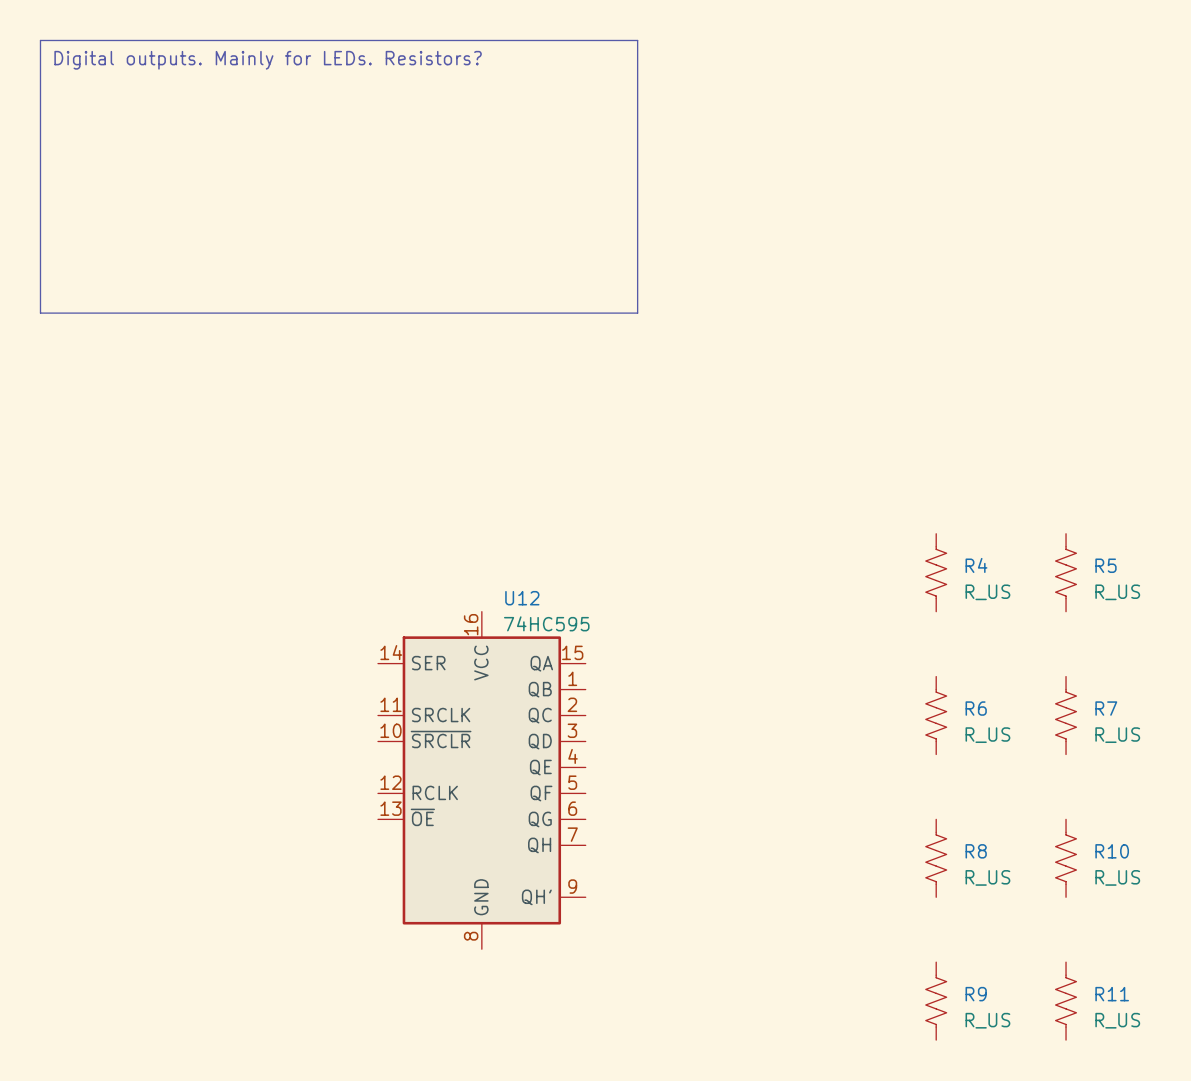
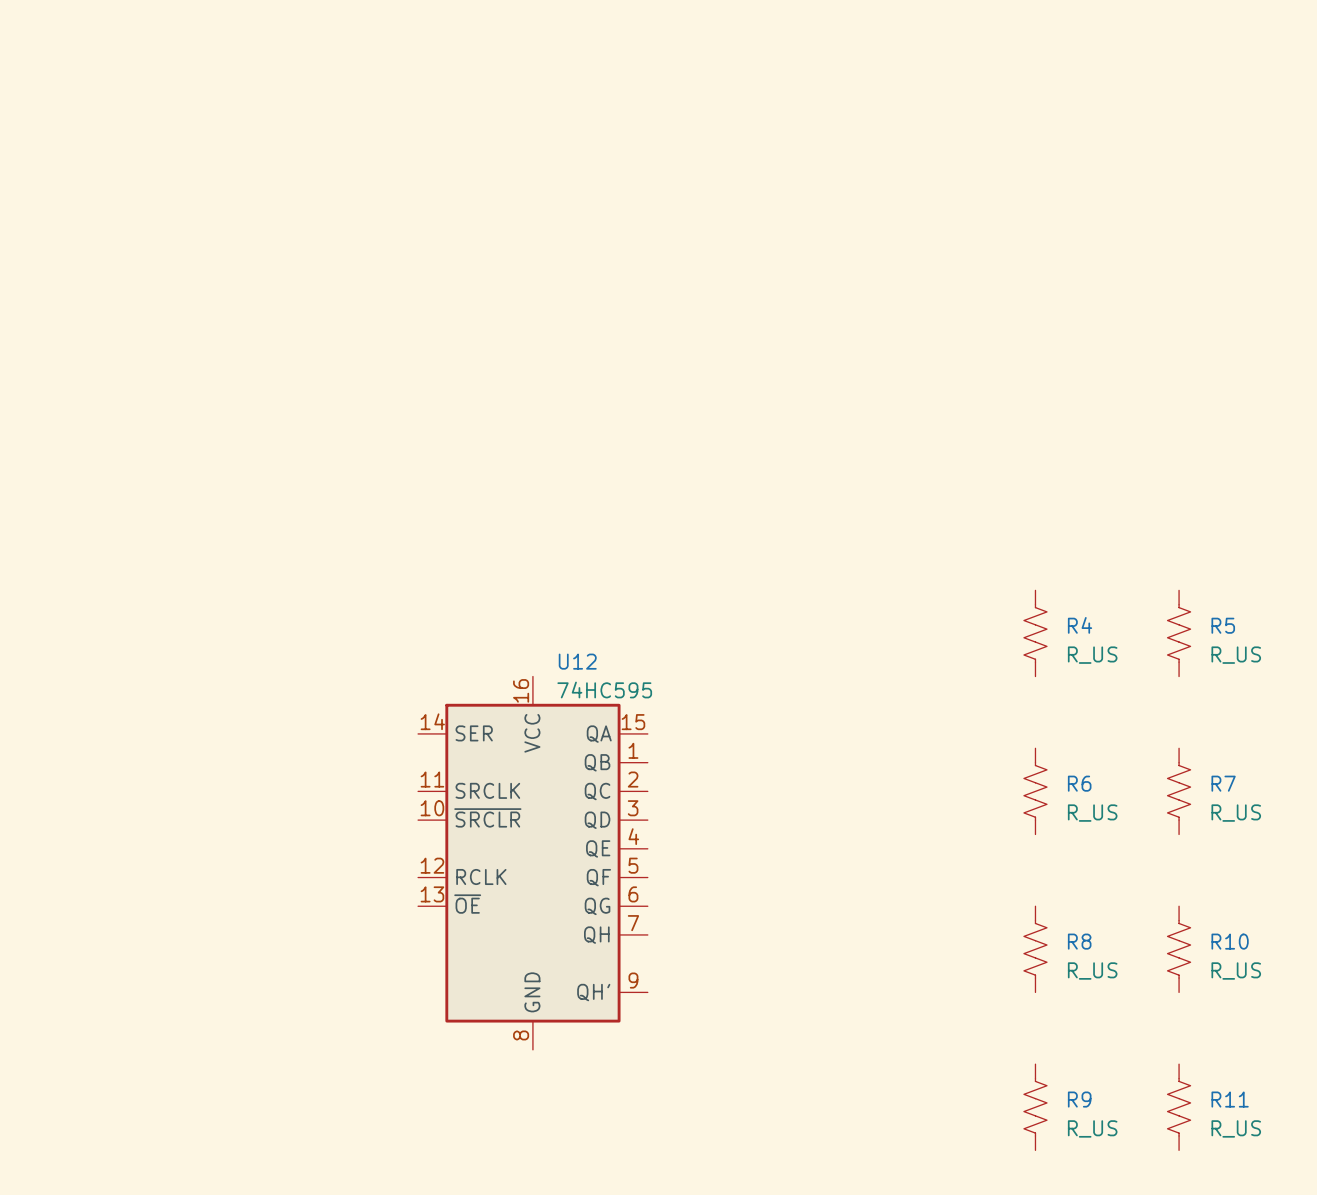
line: (40, 40) (637, 40) (637, 313) (40, 313) (40, 40) -> none
text: Digital outputs. Mainly for LEDs. Resistors? (268, 60) -> none

